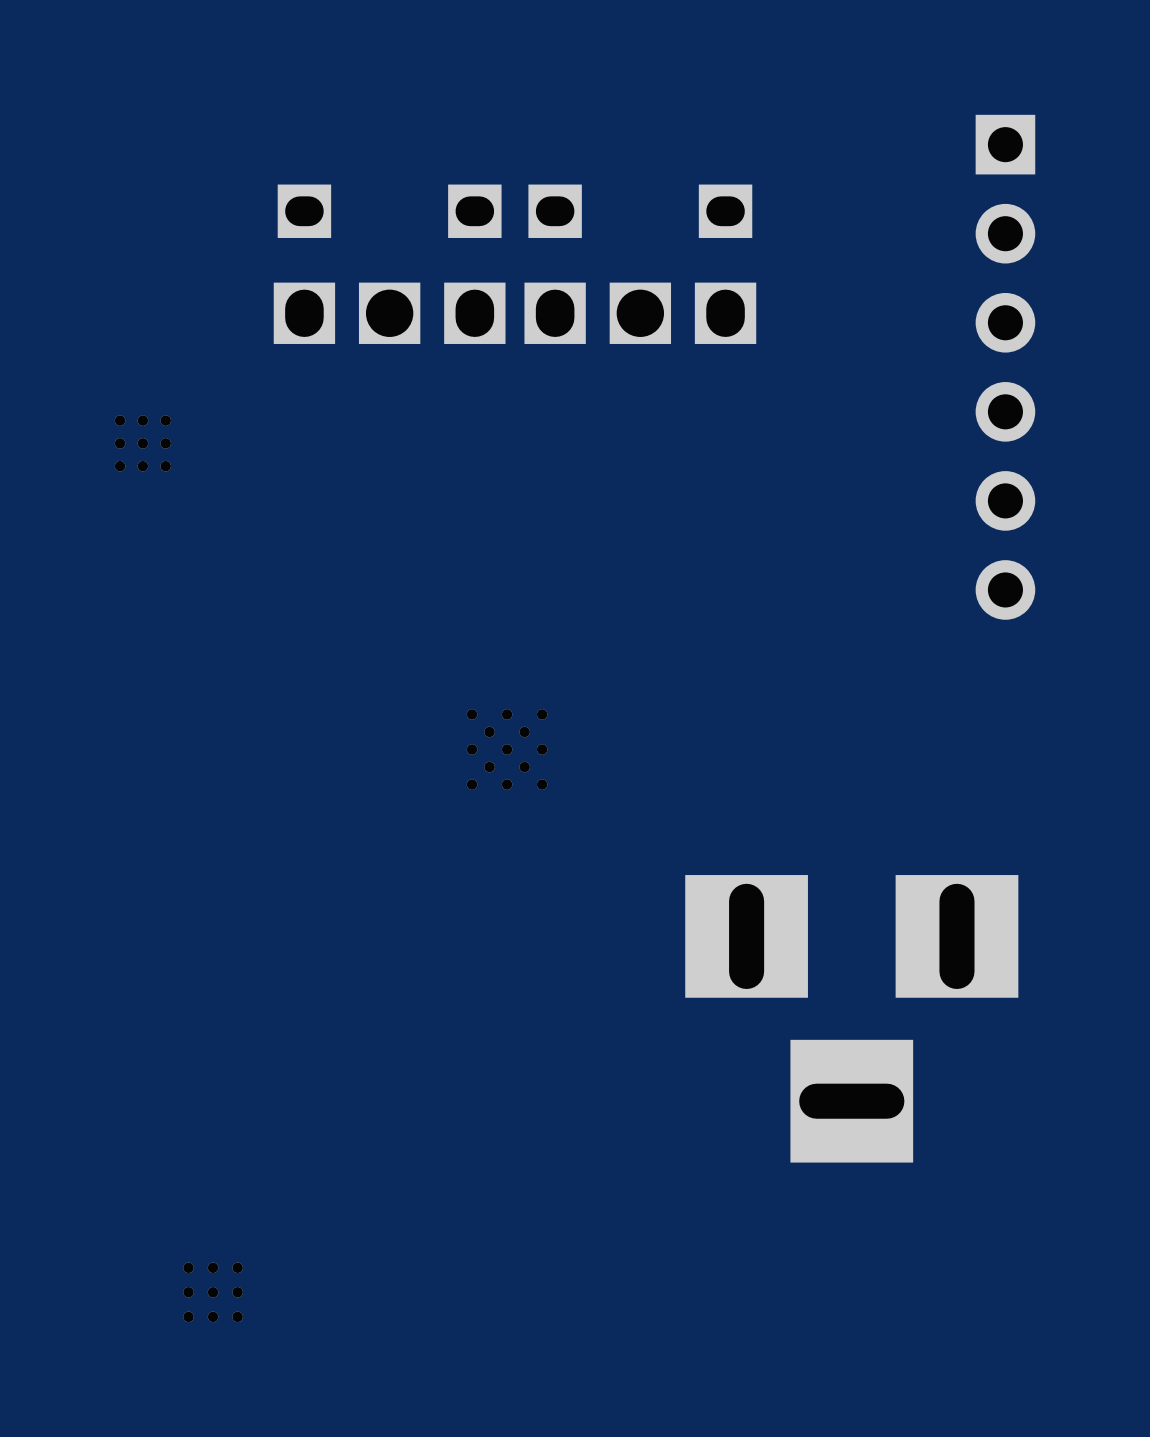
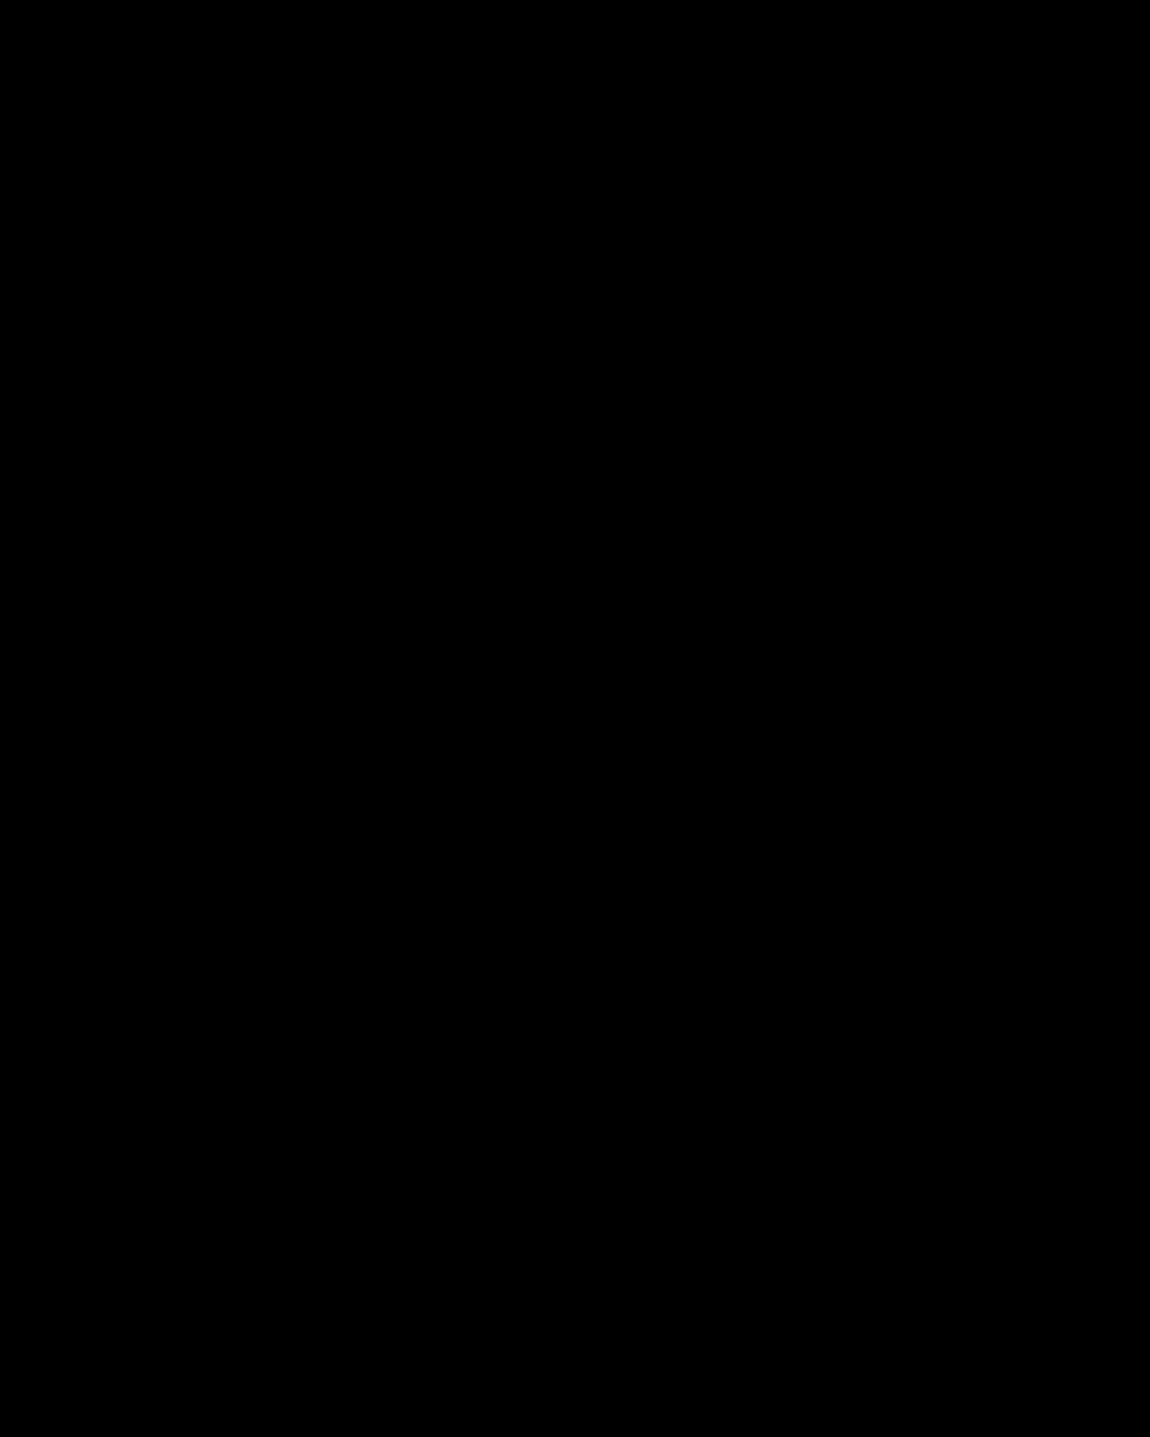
part: (389, 264) -> none
part: (640, 264) -> none
part: (1005, 367) -> none
part: (142, 443) -> none
part: (507, 749) -> none
part: (851, 1018) -> none
part: (213, 1292) -> none

